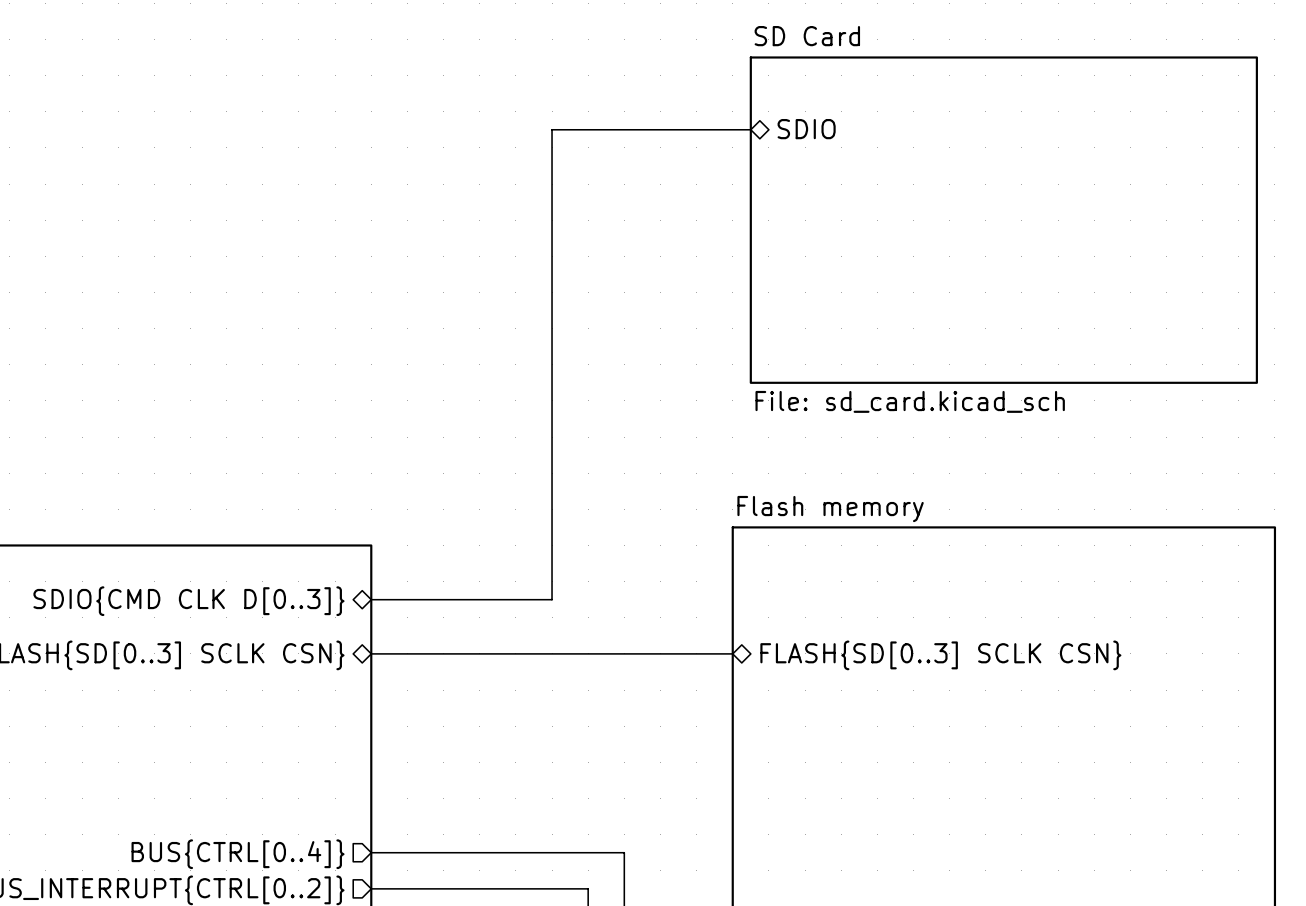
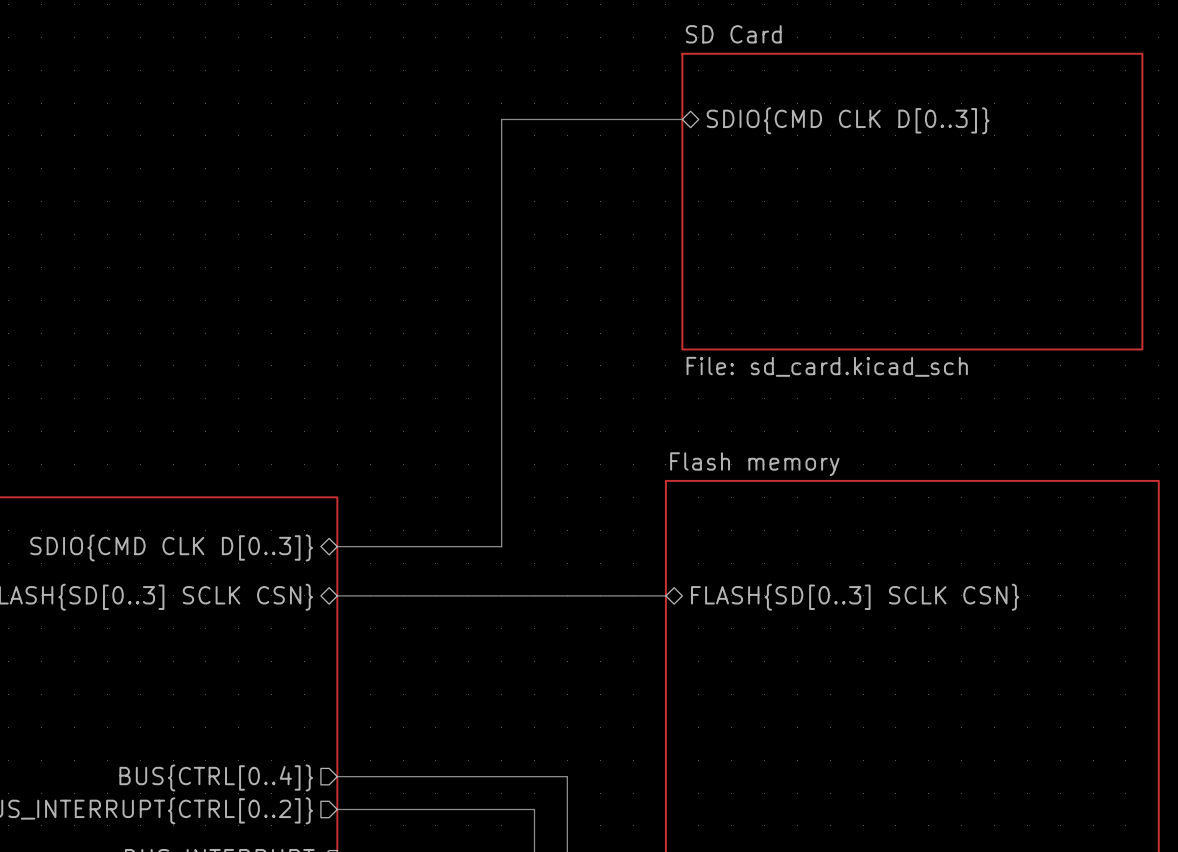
sheet pin: SDIO (806, 129) -> SDIO{CMD CLK D[0..3]} (848, 120)

